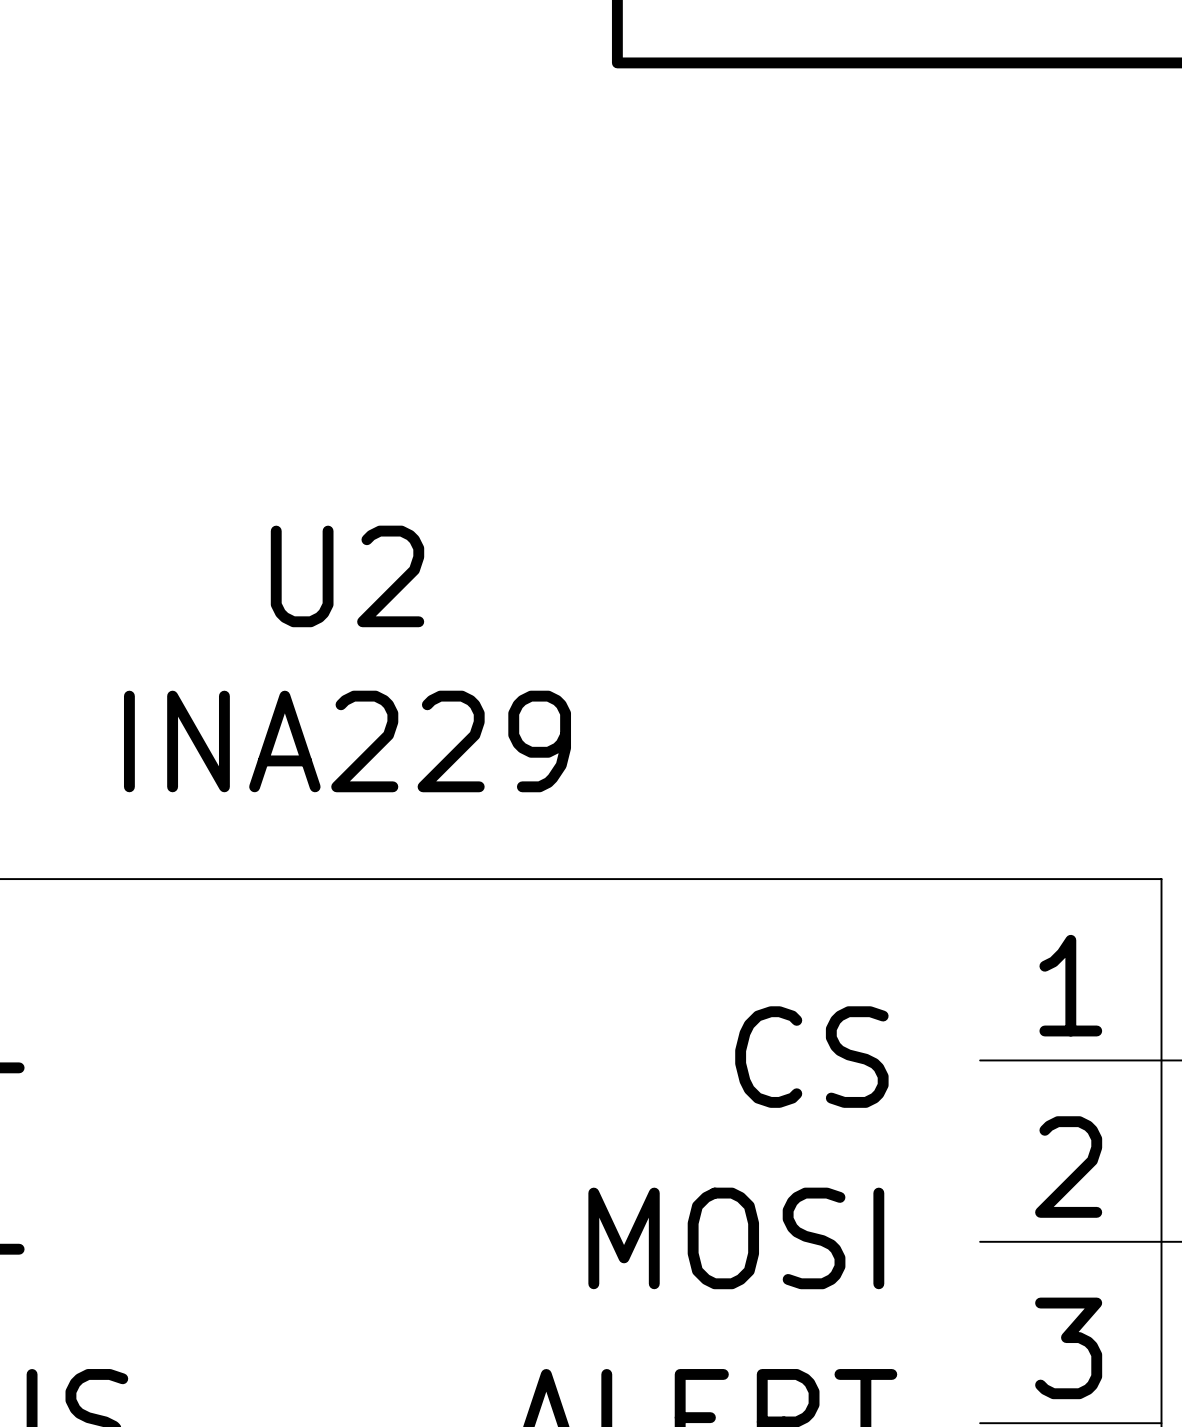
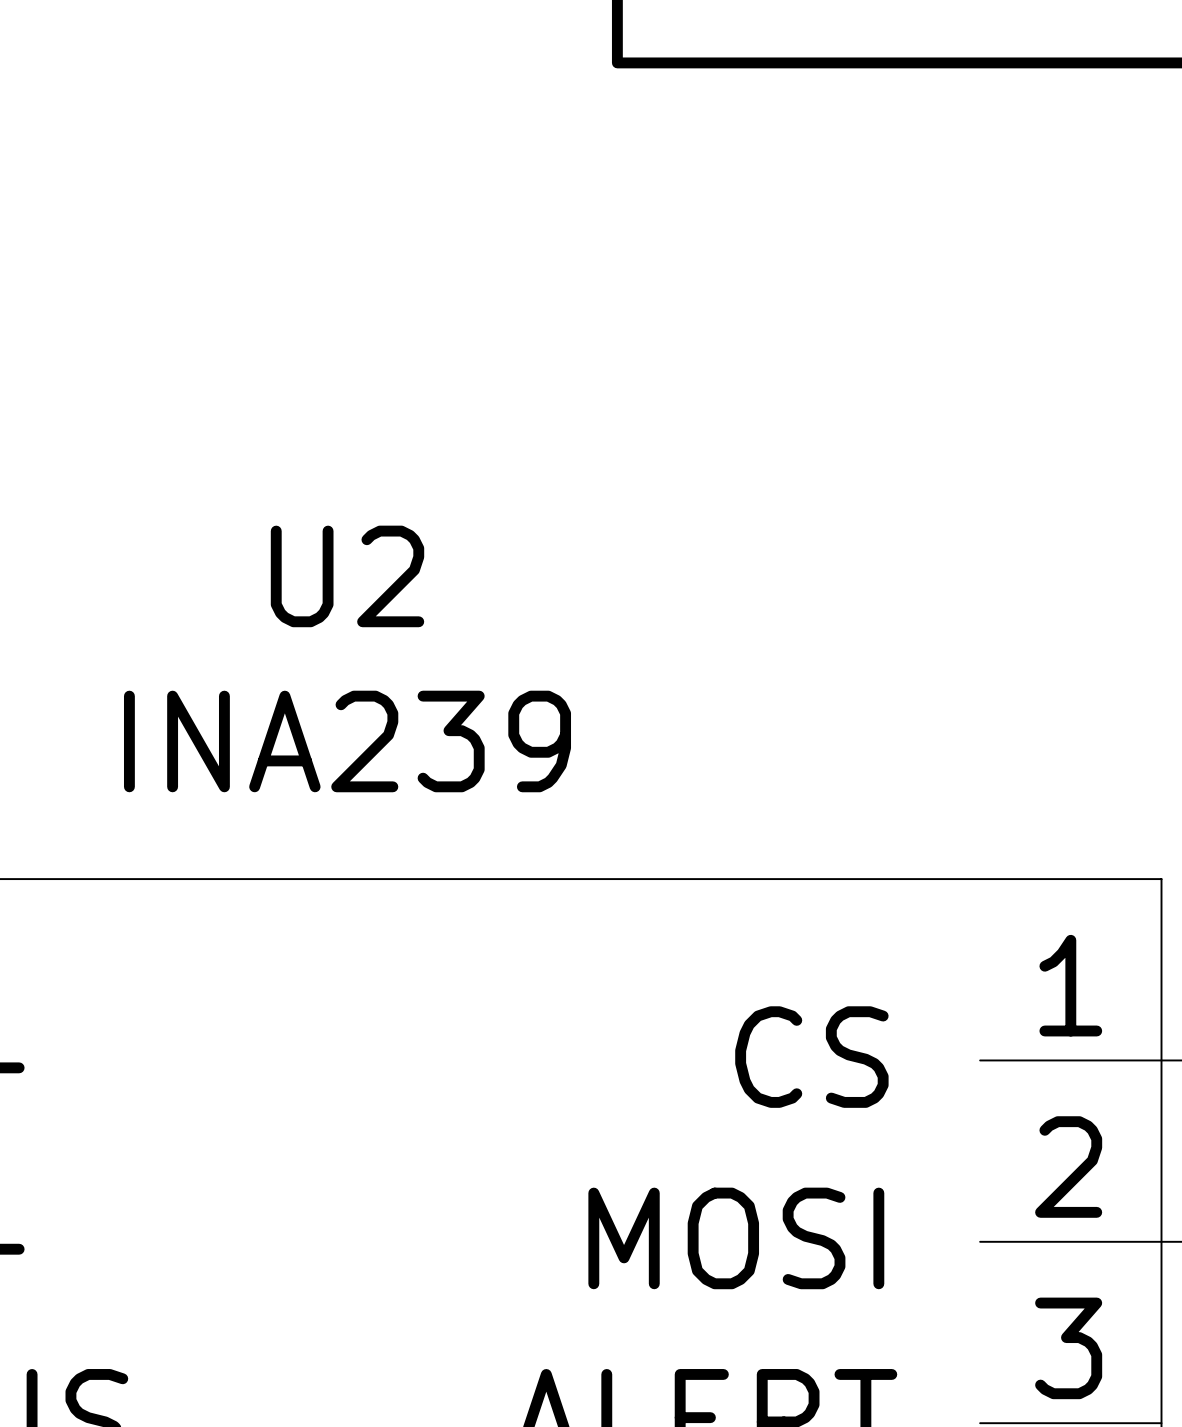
U2 value: INA229 (347, 741) -> INA239 (347, 741)

